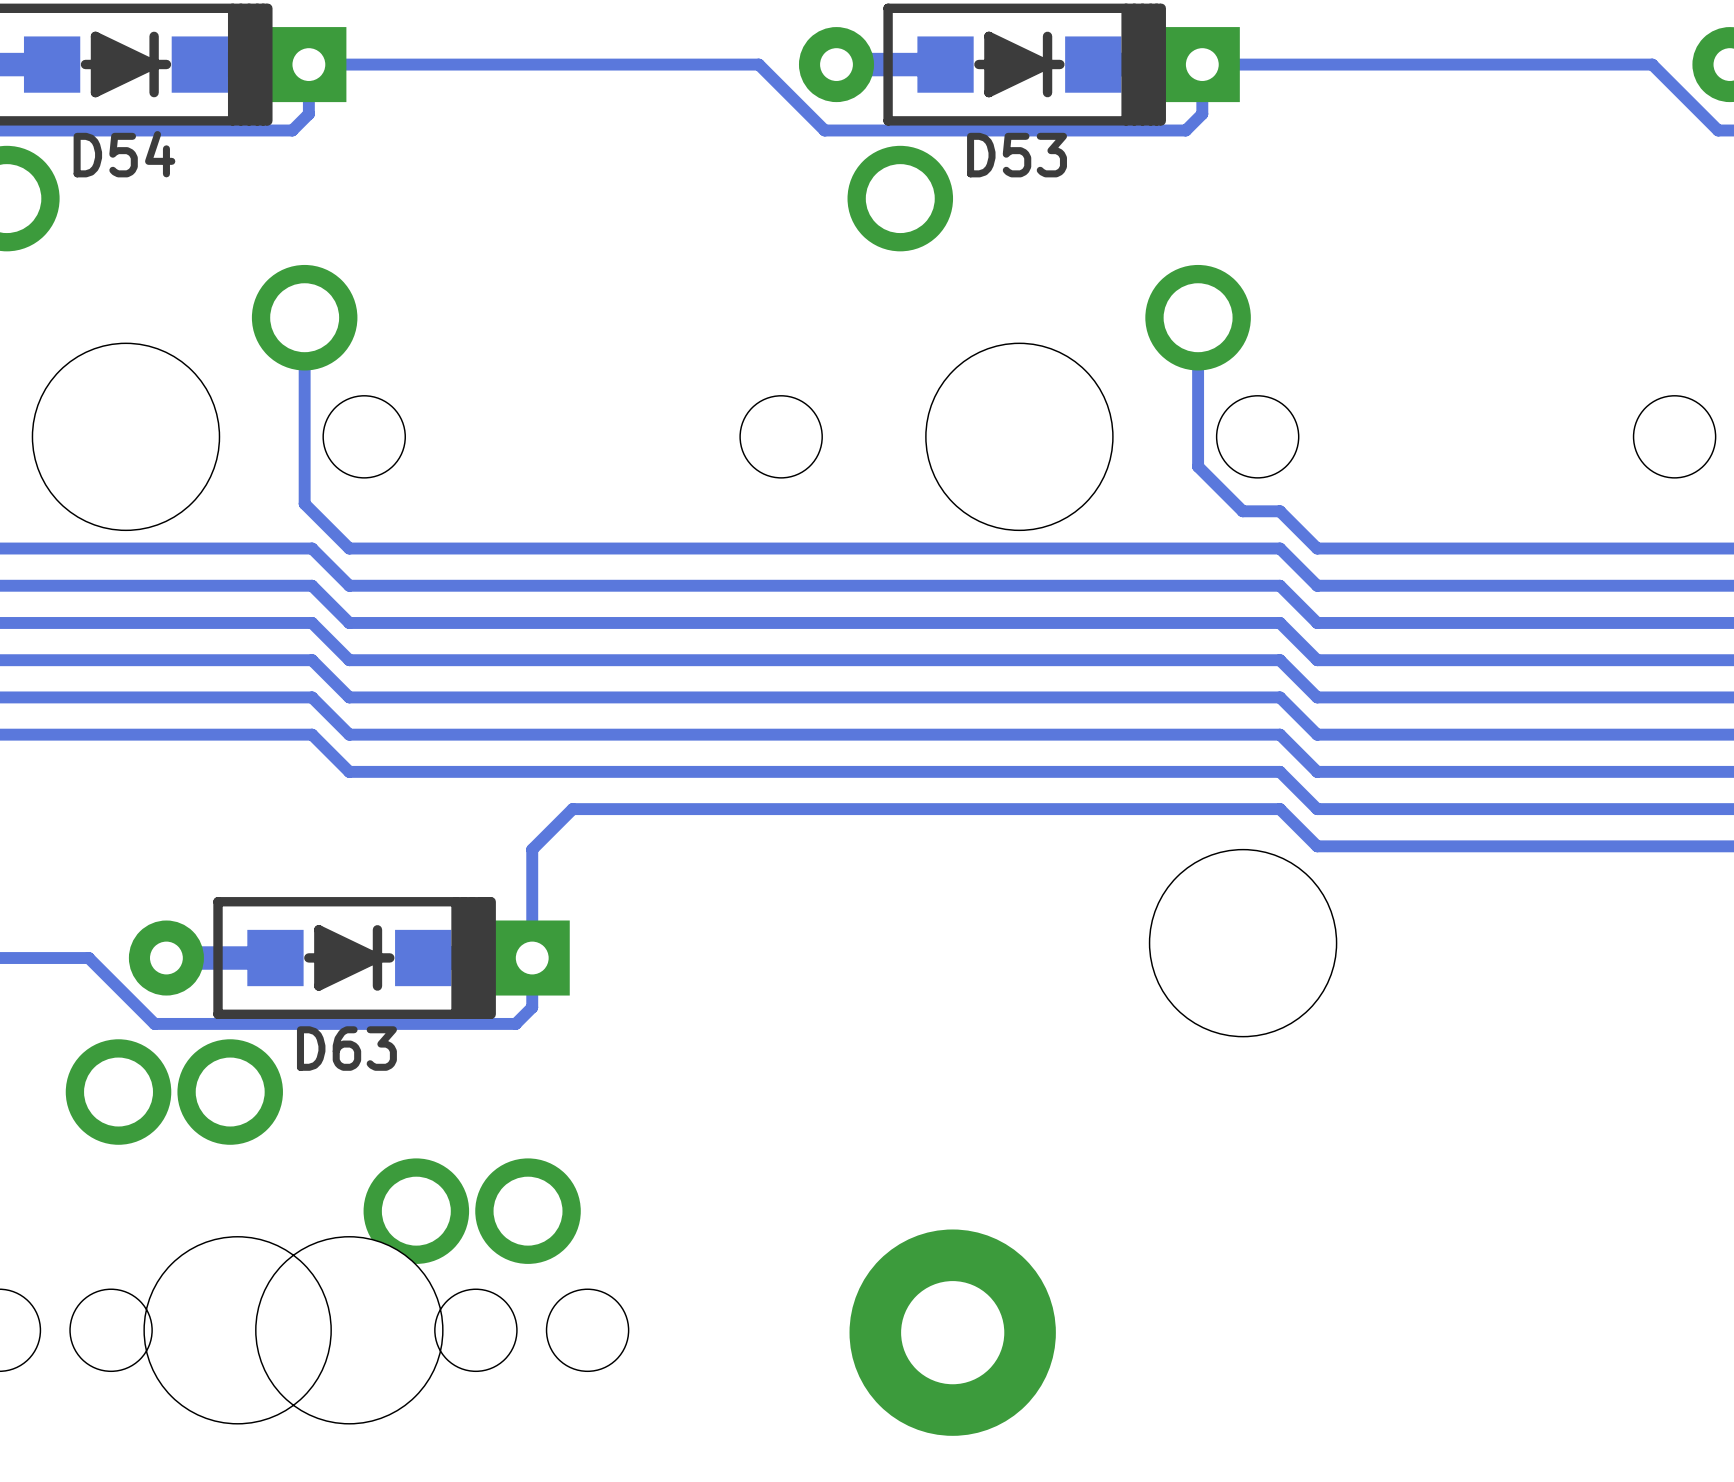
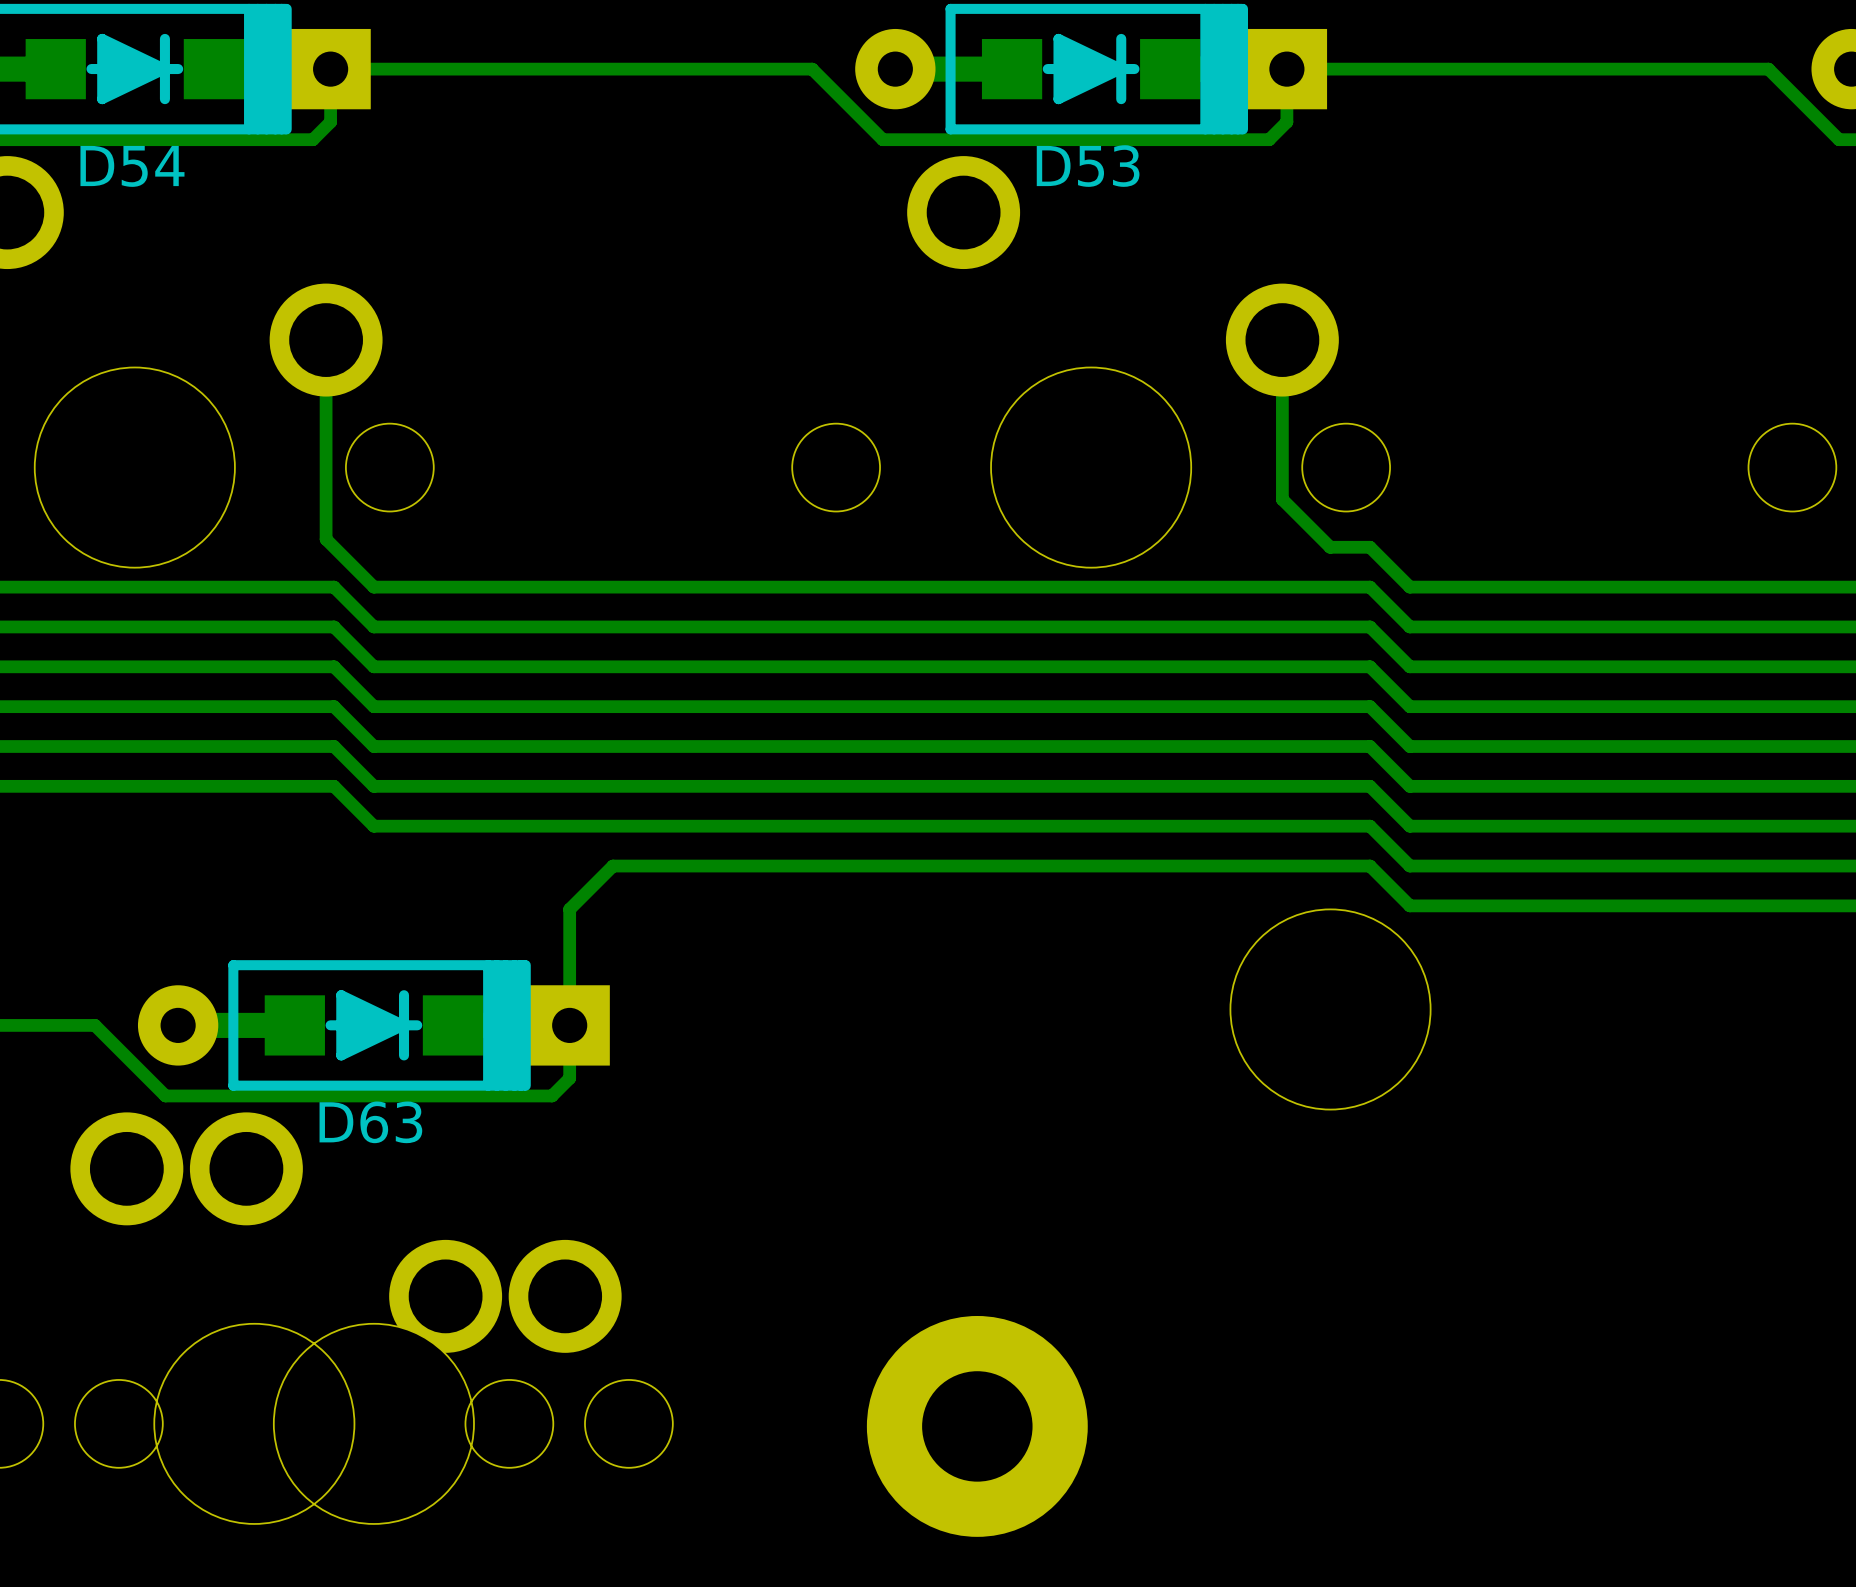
part position: (952, 1332) -> (977, 1426)

